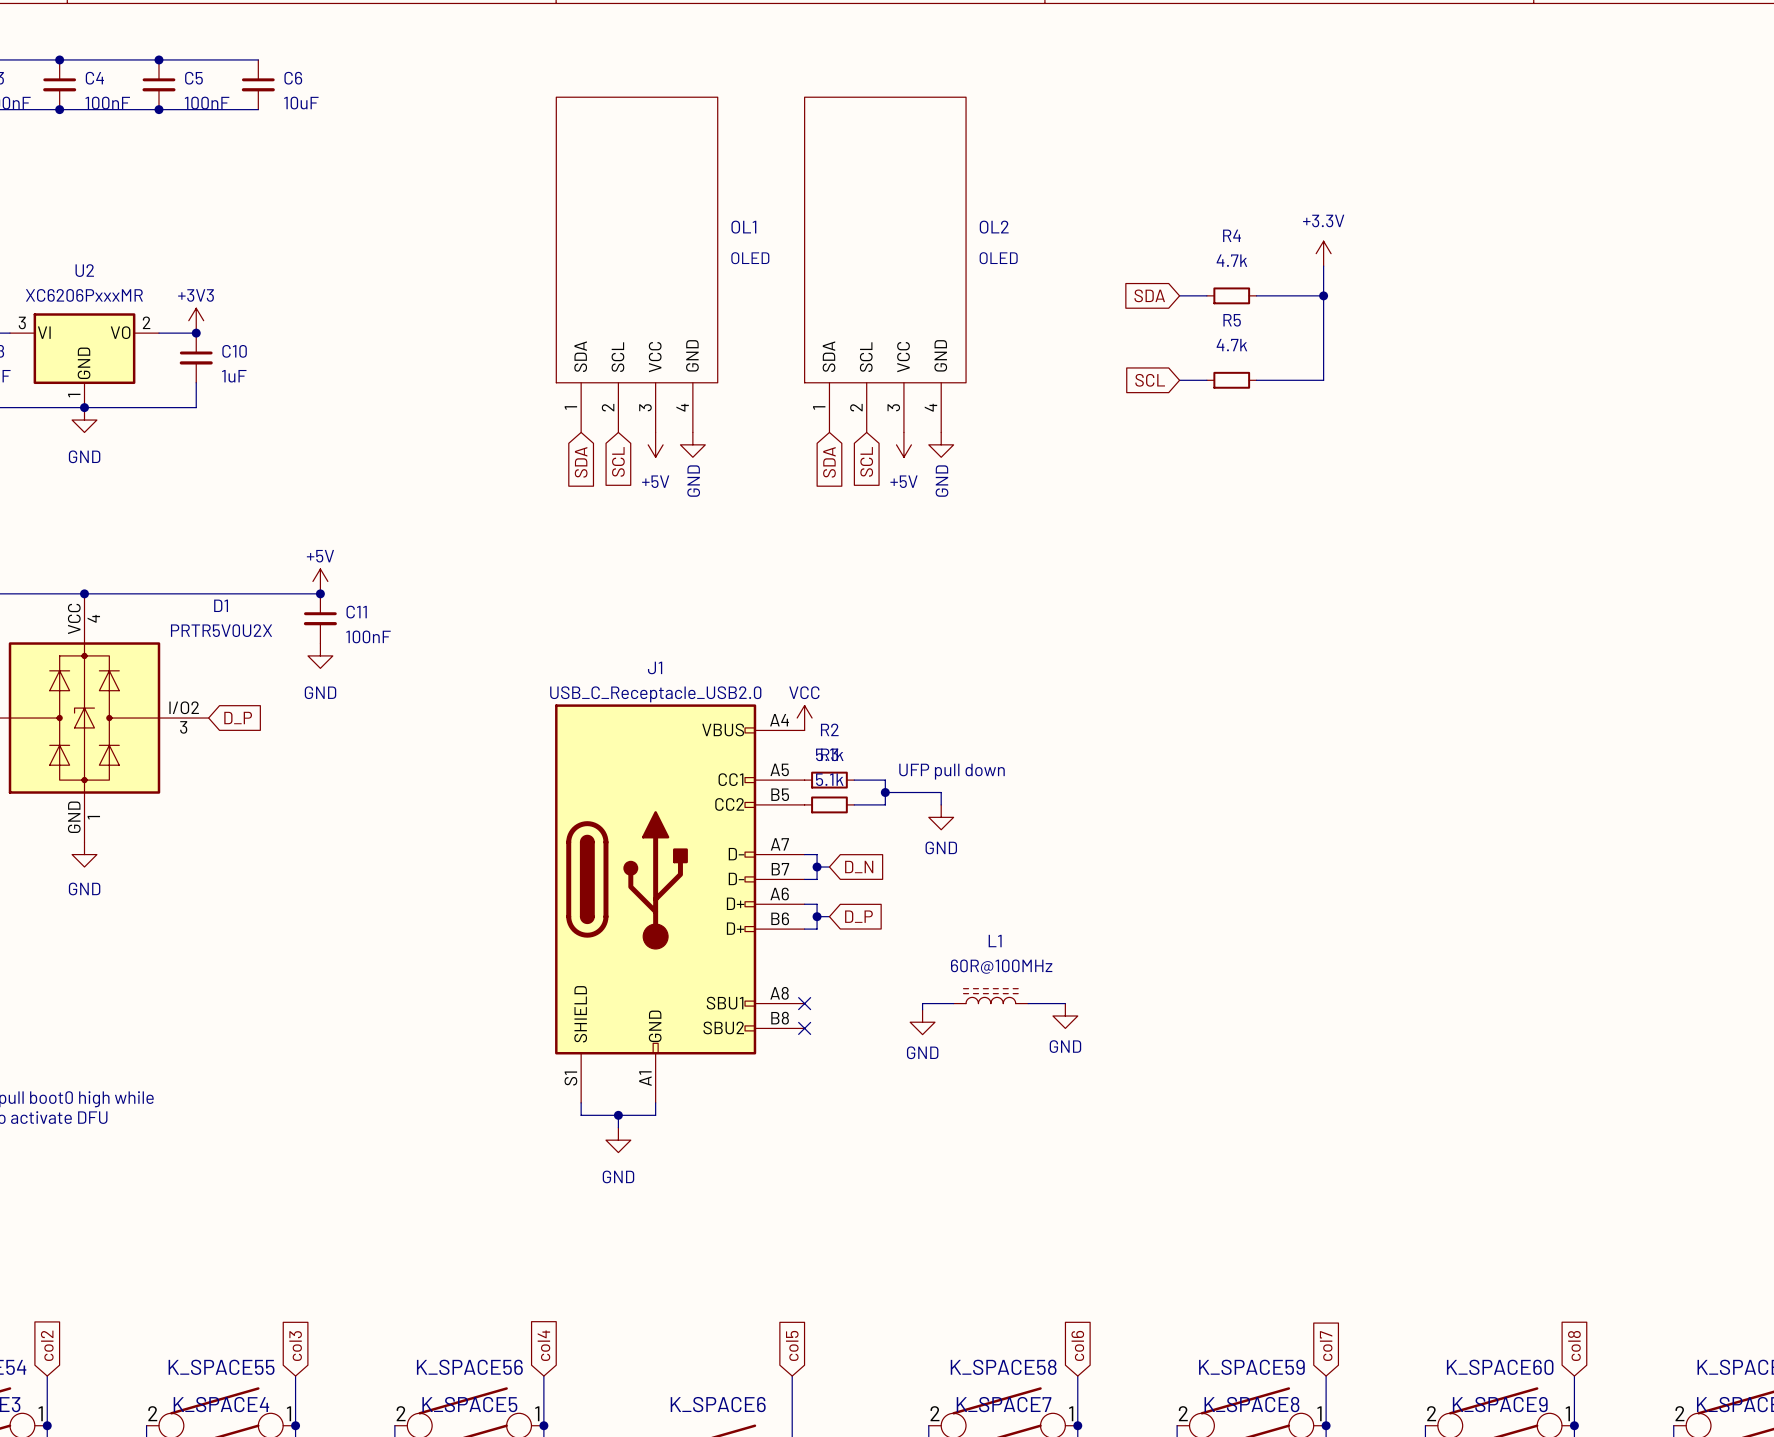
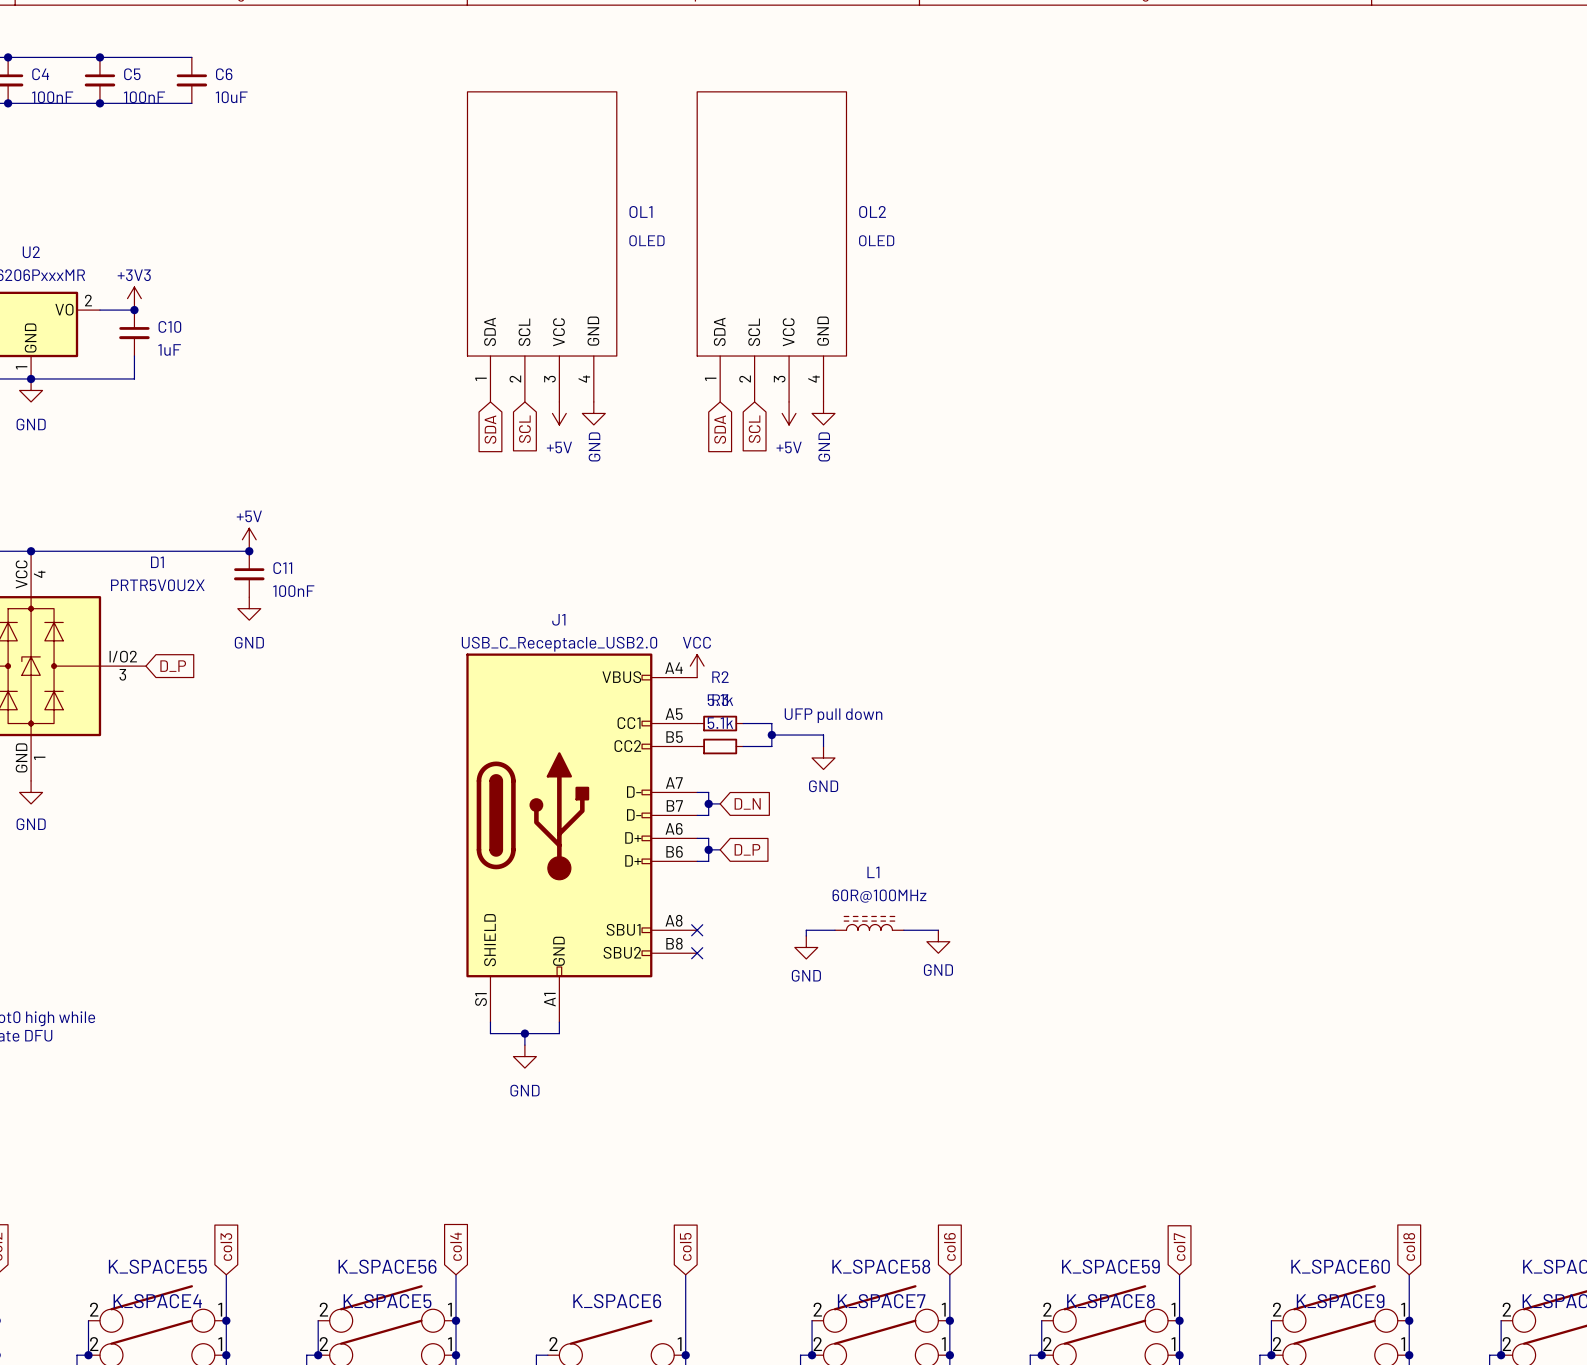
power symbol: +3.3V (1323, 253) -> none
wire: (1323, 266) (1323, 380) (1256, 380) -> none
global label: SDA (1149, 295) -> none
wire: (1179, 295) (1206, 295) -> none
R4: 4.7k (1231, 295) -> none
wire: (1256, 295) (1323, 295) -> none
junction: (1323, 295) -> none
global label: SCL (1150, 380) -> none
wire: (1179, 380) (1206, 380) -> none
R5: 4.7k (1231, 380) -> none

